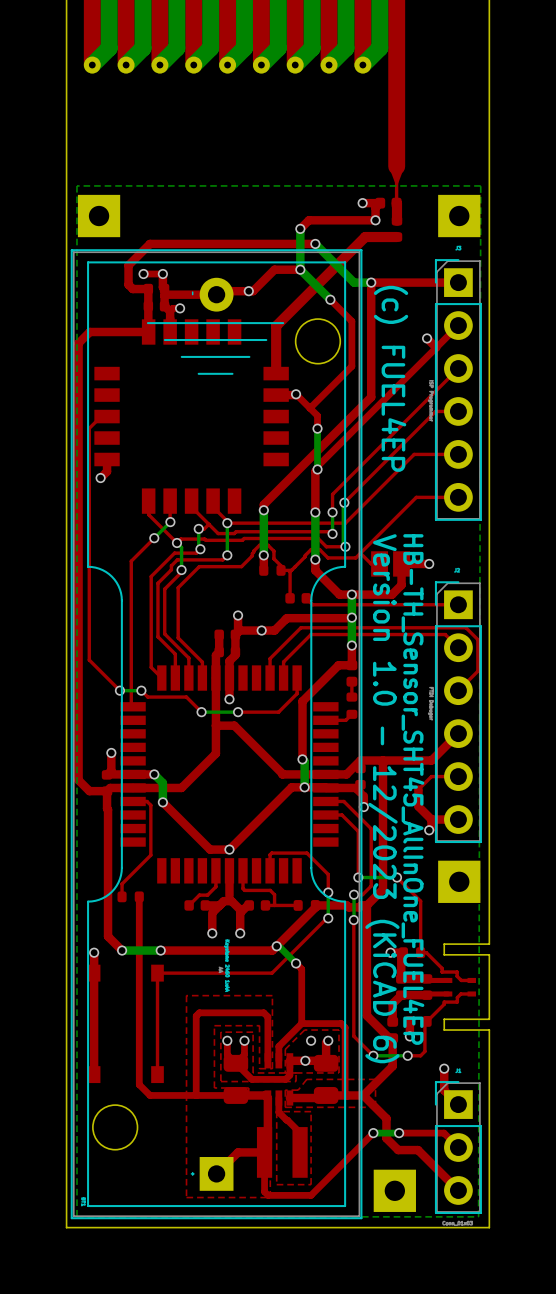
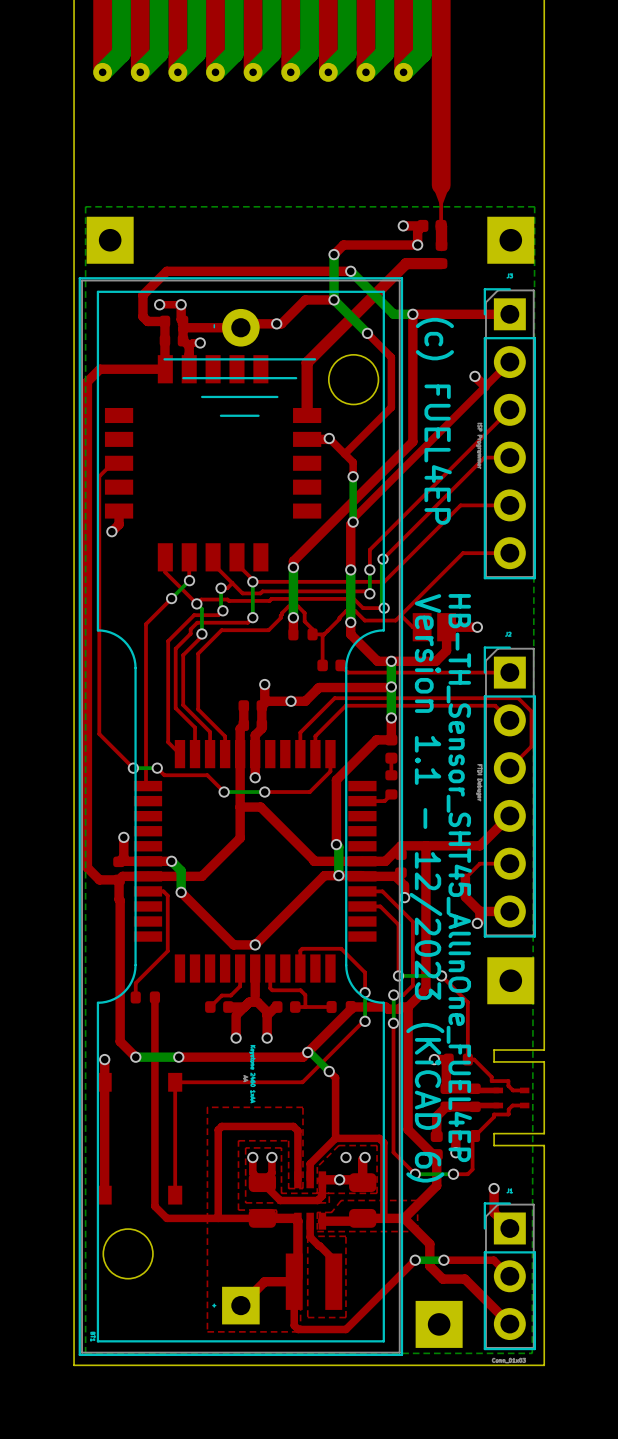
text: Version 1.0 - 12/2023 (KiCAD 6) (382, 798) -> Version 1.1 - 12/2023 (KiCAD 6) (425, 888)

